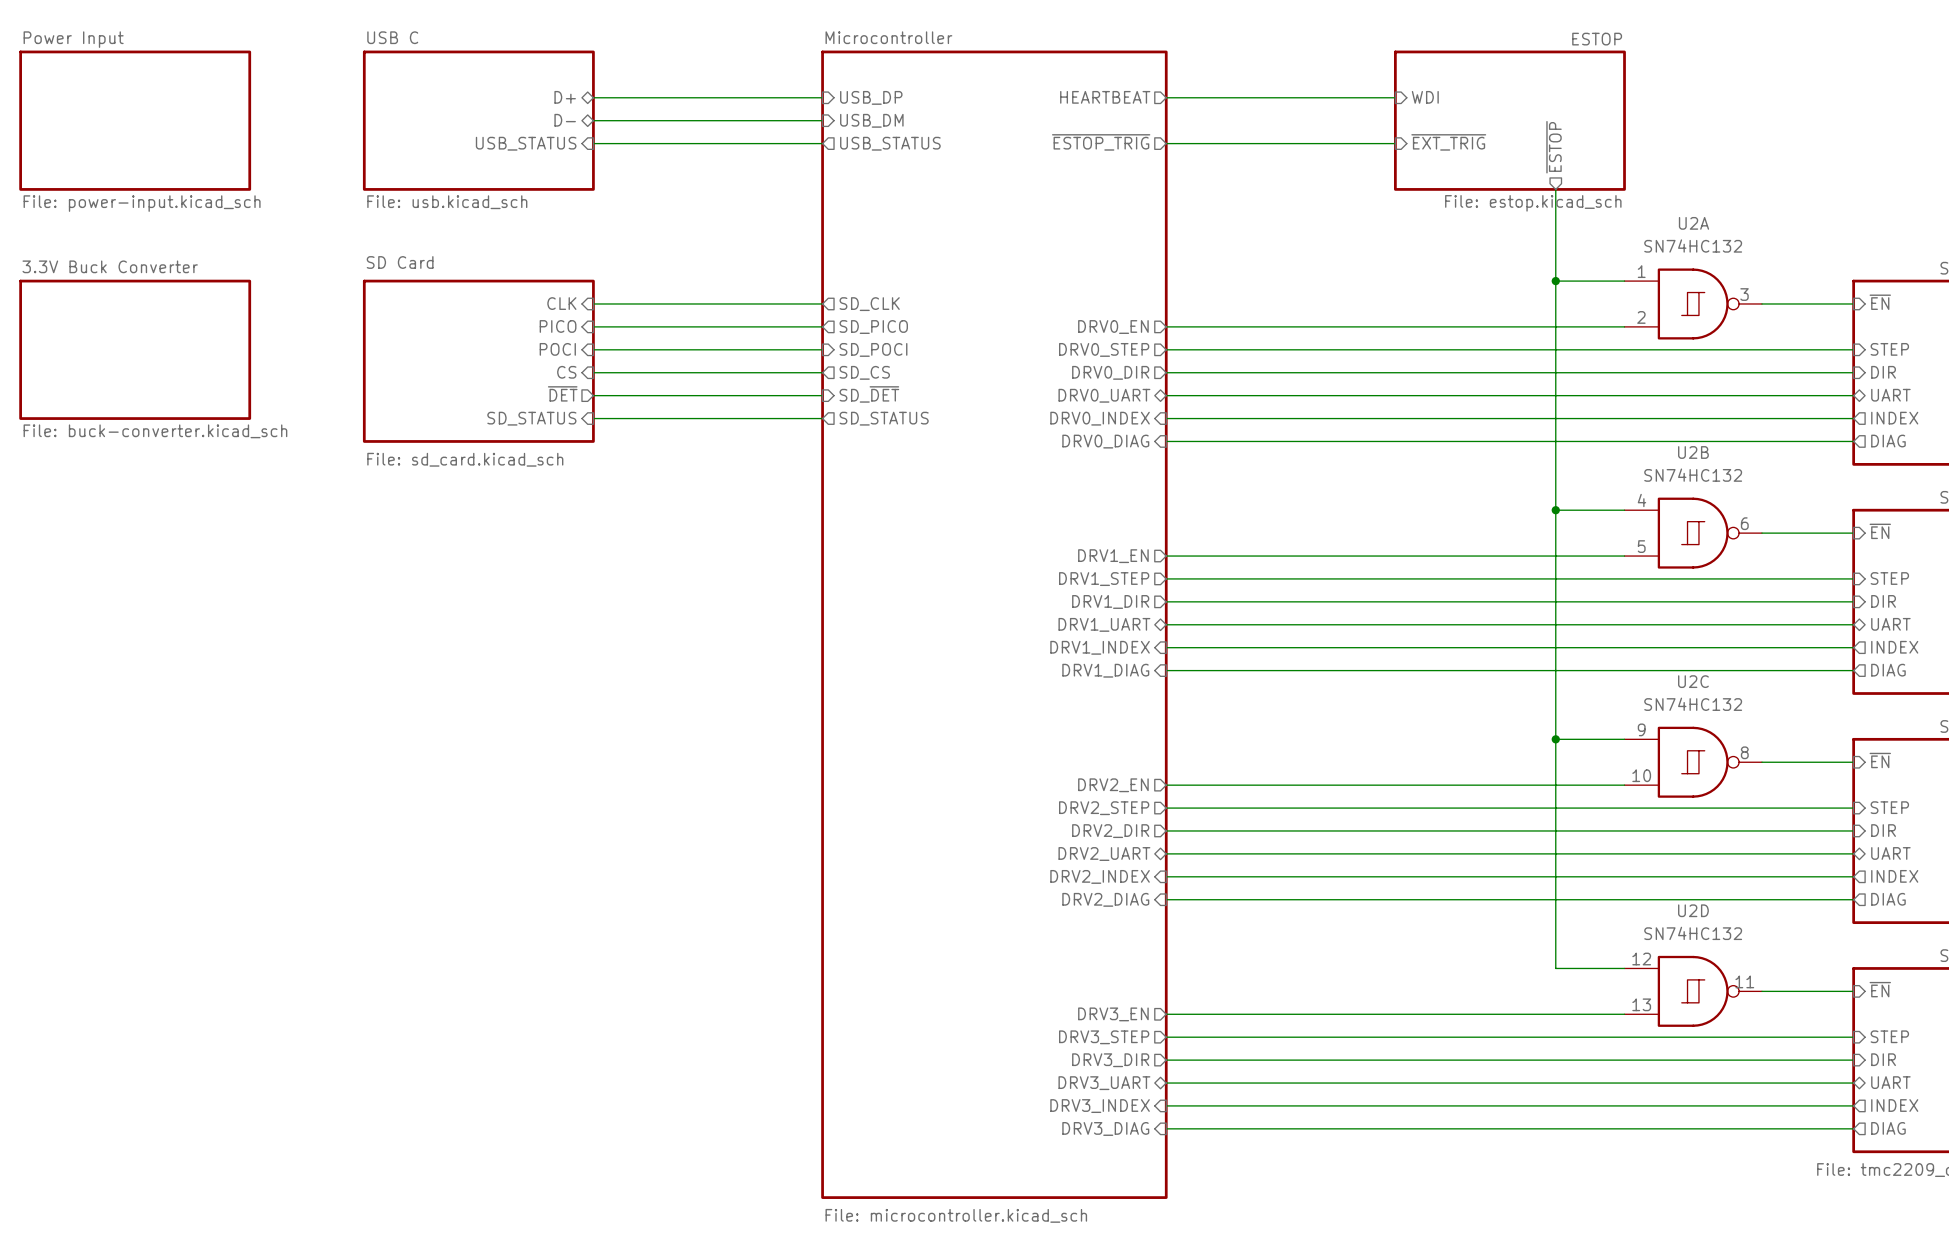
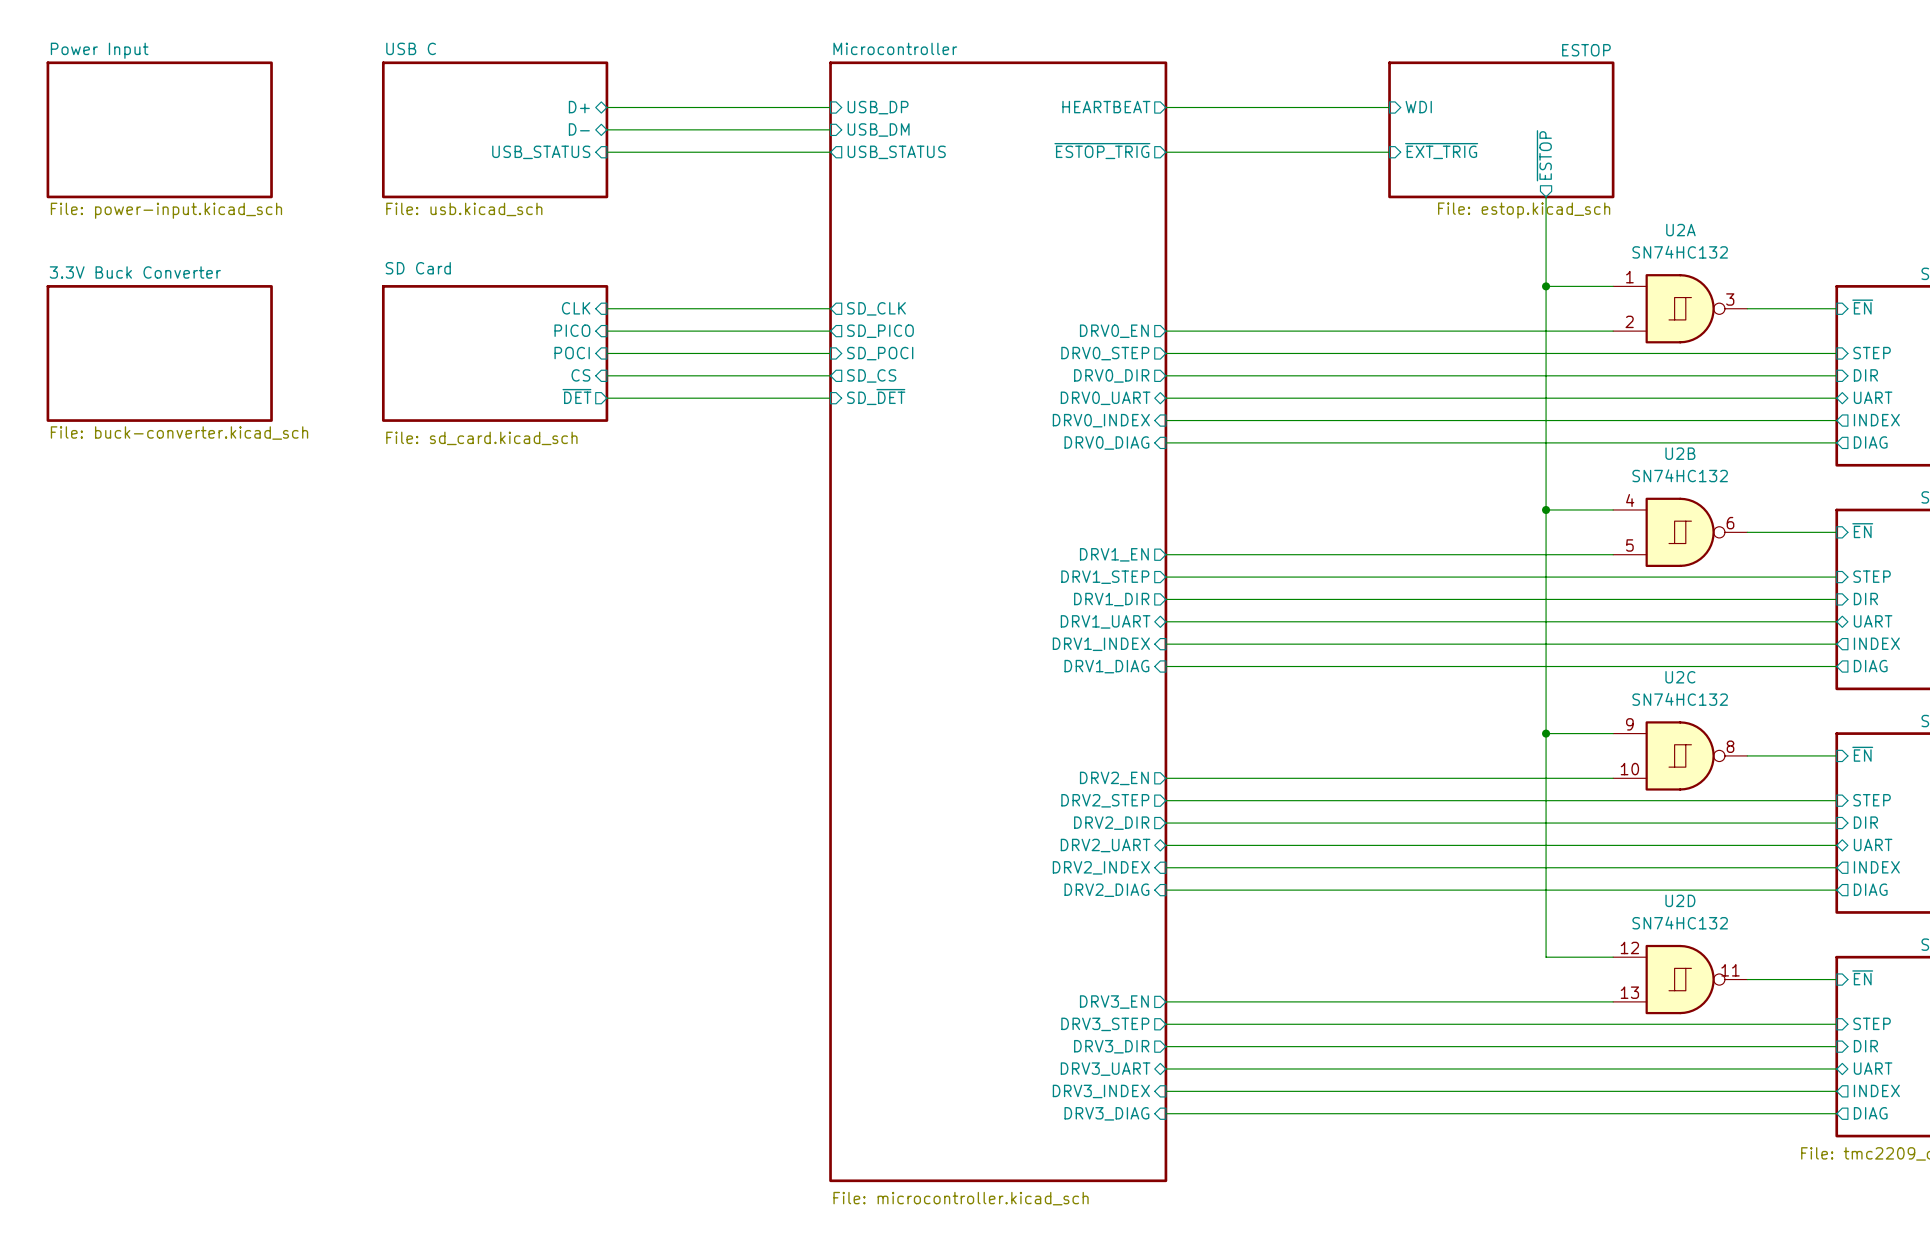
sheet SD Card: none -> File: sd_card.kicad_sch (495, 353)
sheet SD Card: File: sd_card.kicad_sch (478, 361) -> none
sheet pin: SD_STATUS (531, 418) -> none
wire: (593, 418) (822, 418) -> none
sheet pin: SD_STATUS (884, 418) -> none

